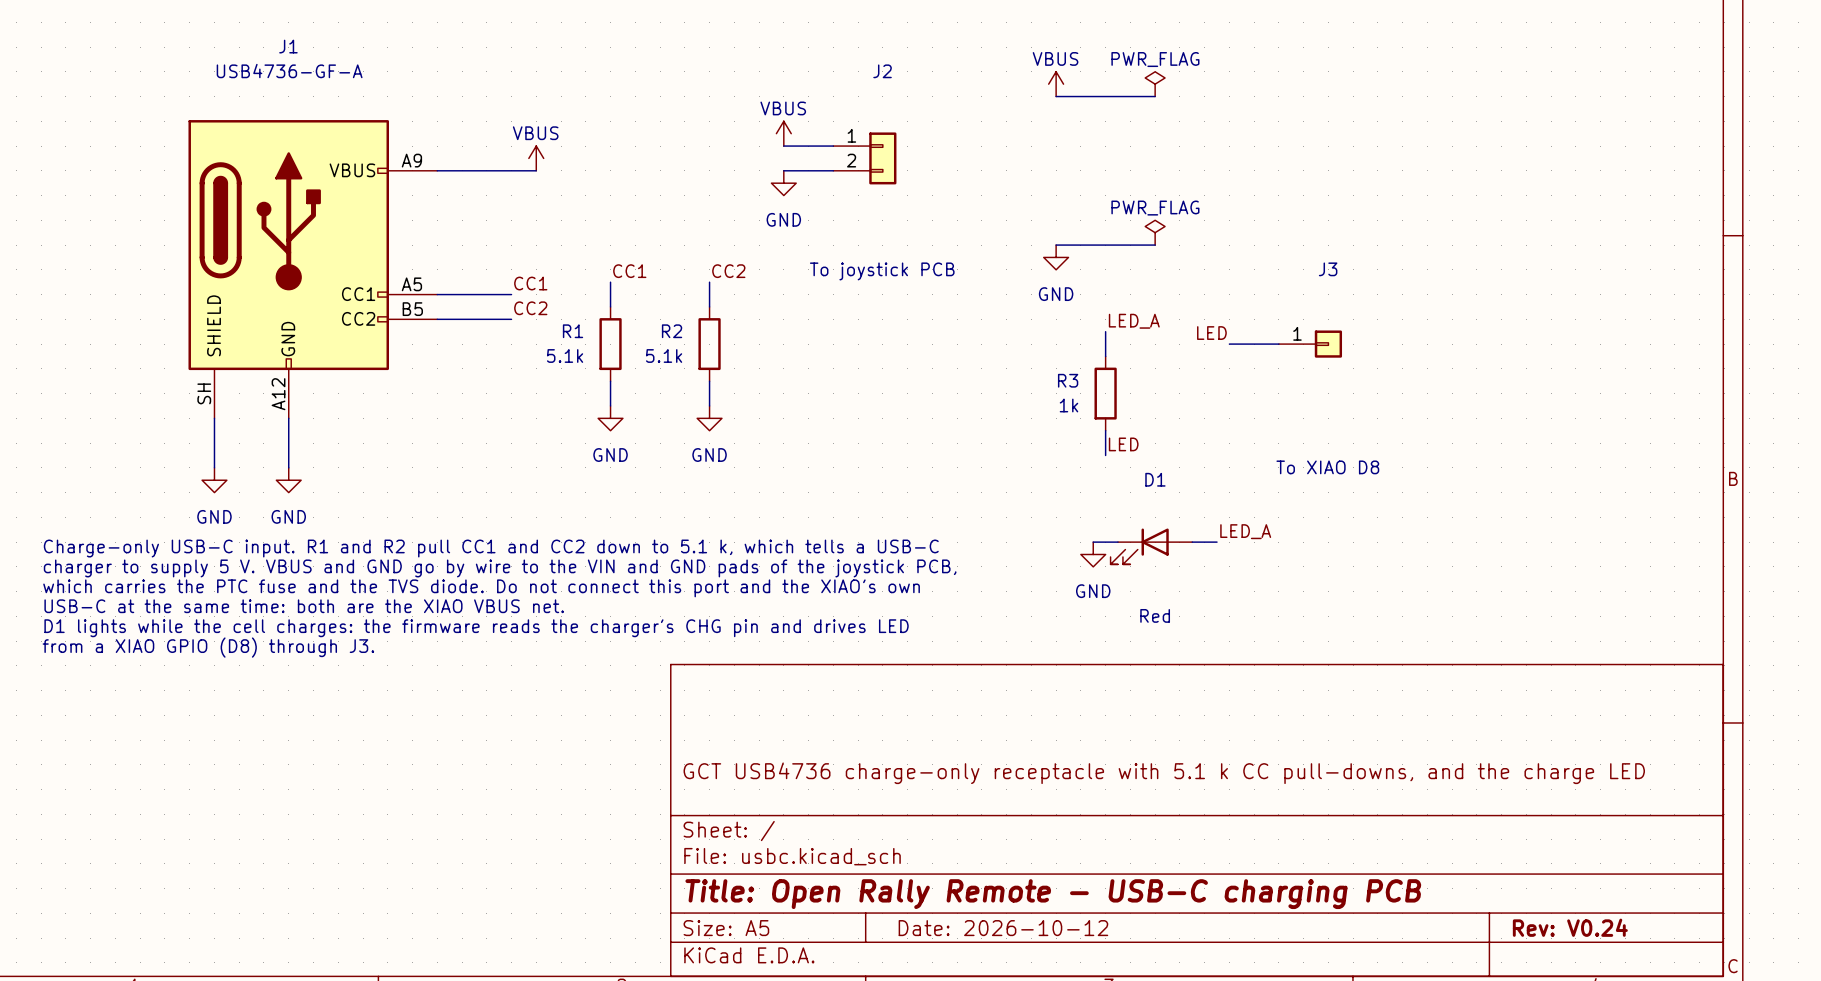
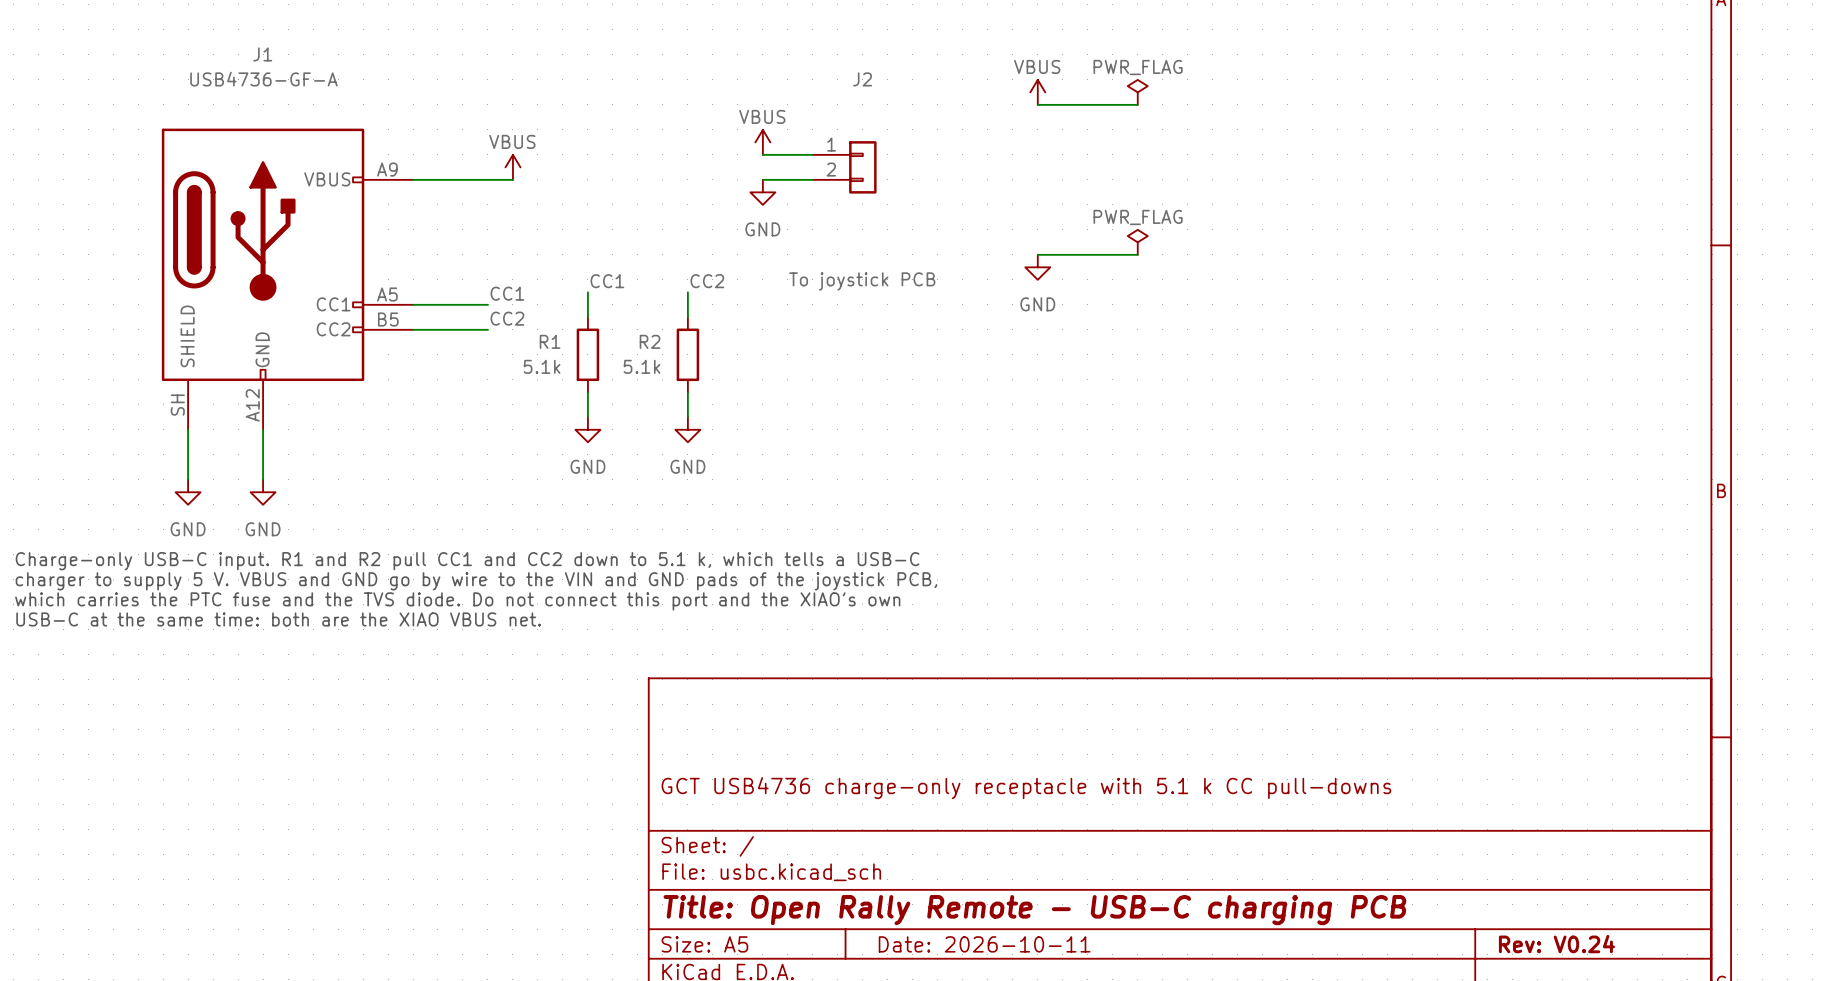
label: LED_A (1134, 321) -> none
wire: (1105, 331) (1105, 356) -> none
label: LED (1211, 333) -> none
wire: (1229, 344) (1278, 344) -> none
J3: To XIAO D8 (1310, 344) -> none
R3: 1k (1105, 393) -> none
wire: (1105, 430) (1105, 455) -> none
label: LED (1123, 444) -> none
label: LED_A (1245, 531) -> none
wire: (1093, 542) (1118, 542) -> none
wire: (1192, 542) (1217, 542) -> none
D1: Red (1151, 546) -> none
power symbol: GND (1093, 554) -> none
text: D1 lights while the cell charges: the firmware reads the charger's CHG pin and drives LED (476, 628) -> none
text: from a XIAO GPIO (D8) through J3. (208, 647) -> none
title block: GCT USB4736 charge-only receptacle with 5.1 k CC pull-downs, and the charge LED (1164, 773) -> GCT USB4736 charge-only receptacle with 5.1 k CC pull-downs (1026, 788)
title block: Date: 2026-10-12 (1003, 928) -> Date: 2026-10-11 (984, 944)

